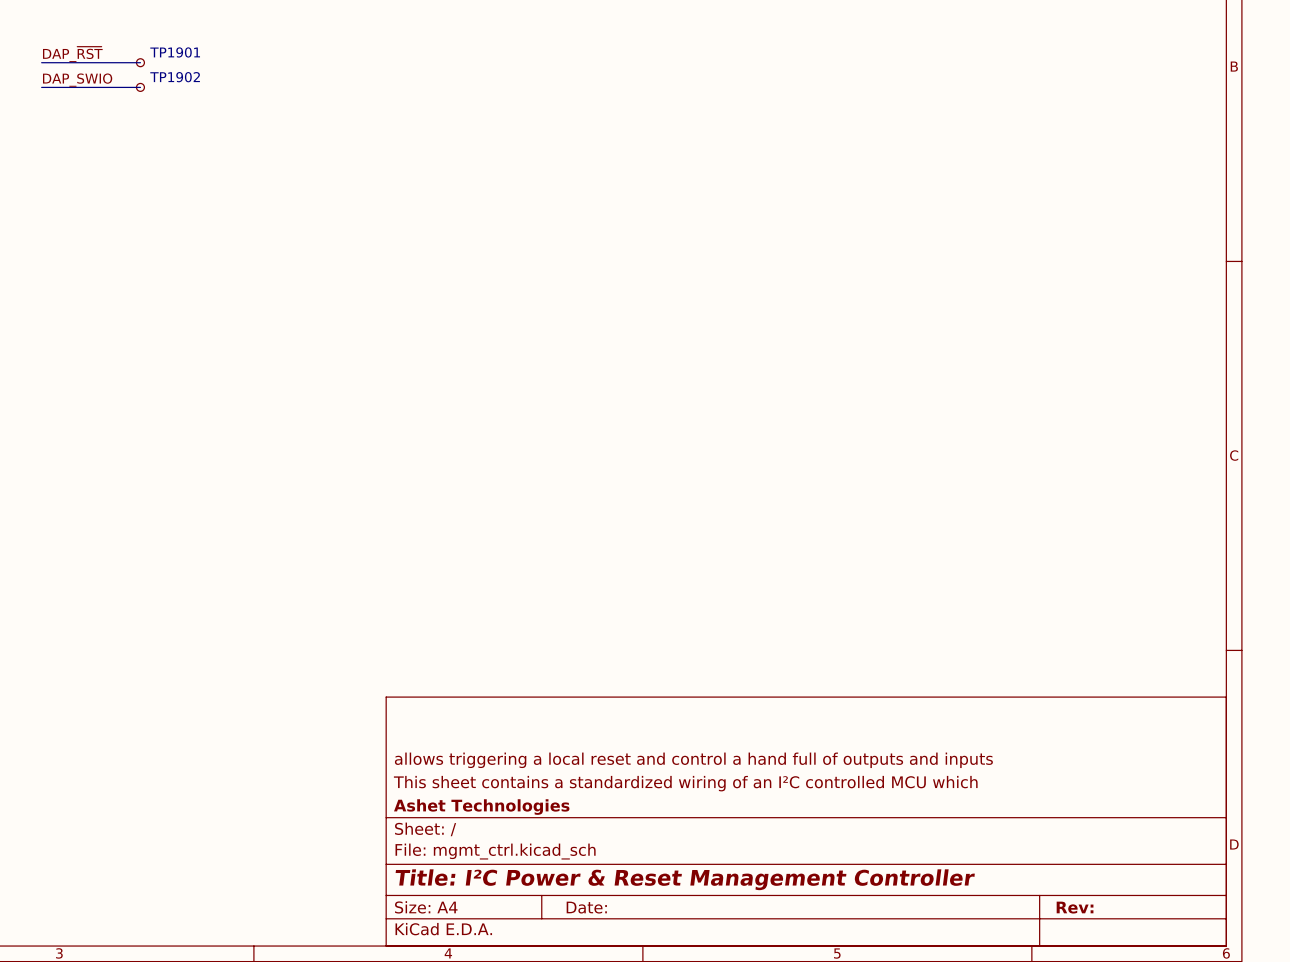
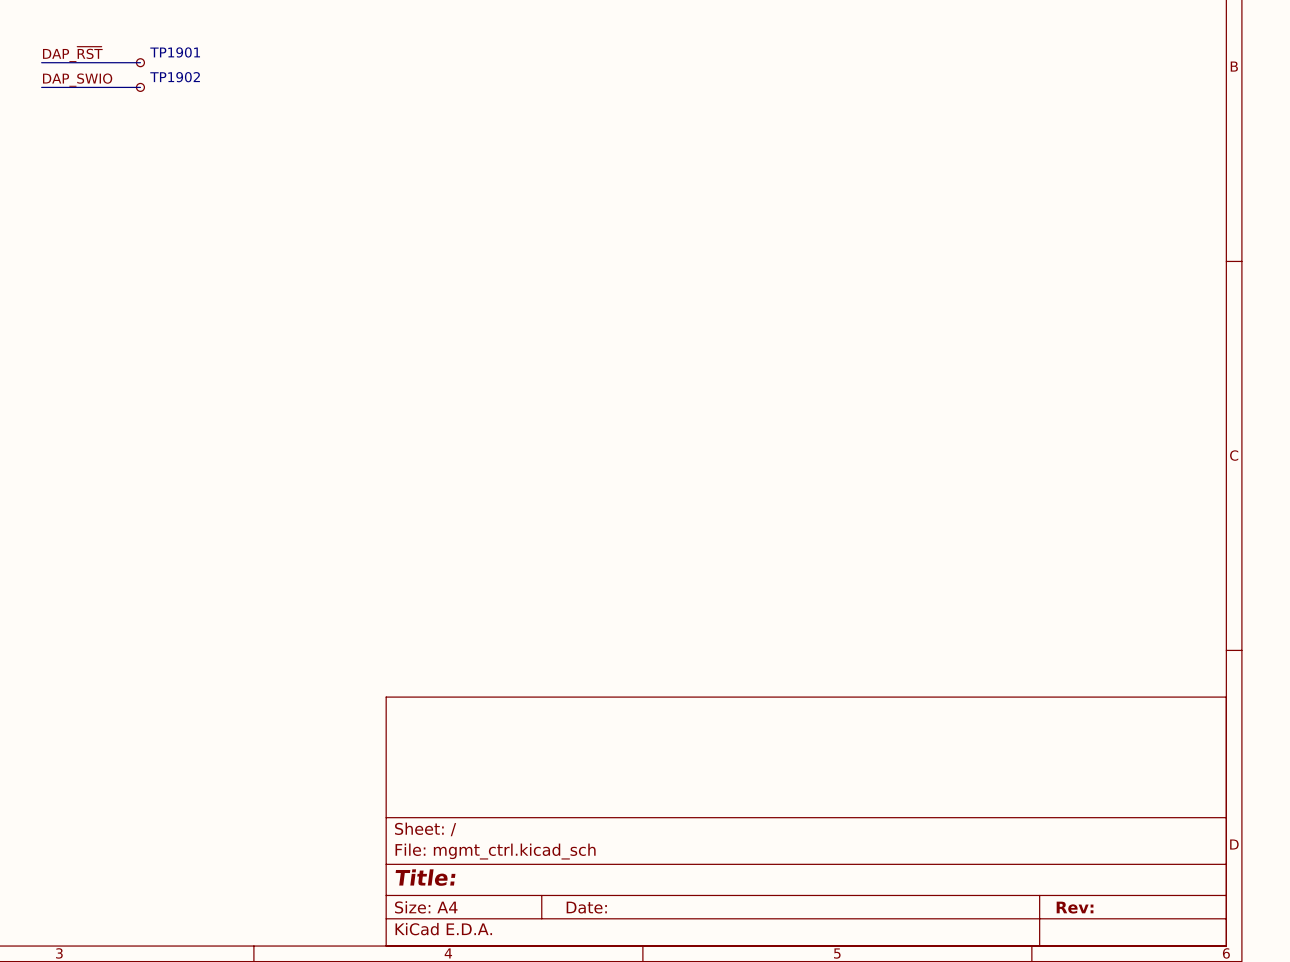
title block: allows triggering a local reset and control a hand full of outputs and inputs (693, 760) -> none
title block: This sheet contains a standardized wiring of an I²C controlled MCU which (685, 783) -> none
title block: Ashet Technologies (481, 807) -> none
title block: Title: I²C Power & Reset Management Controller (685, 879) -> Title: (425, 877)

